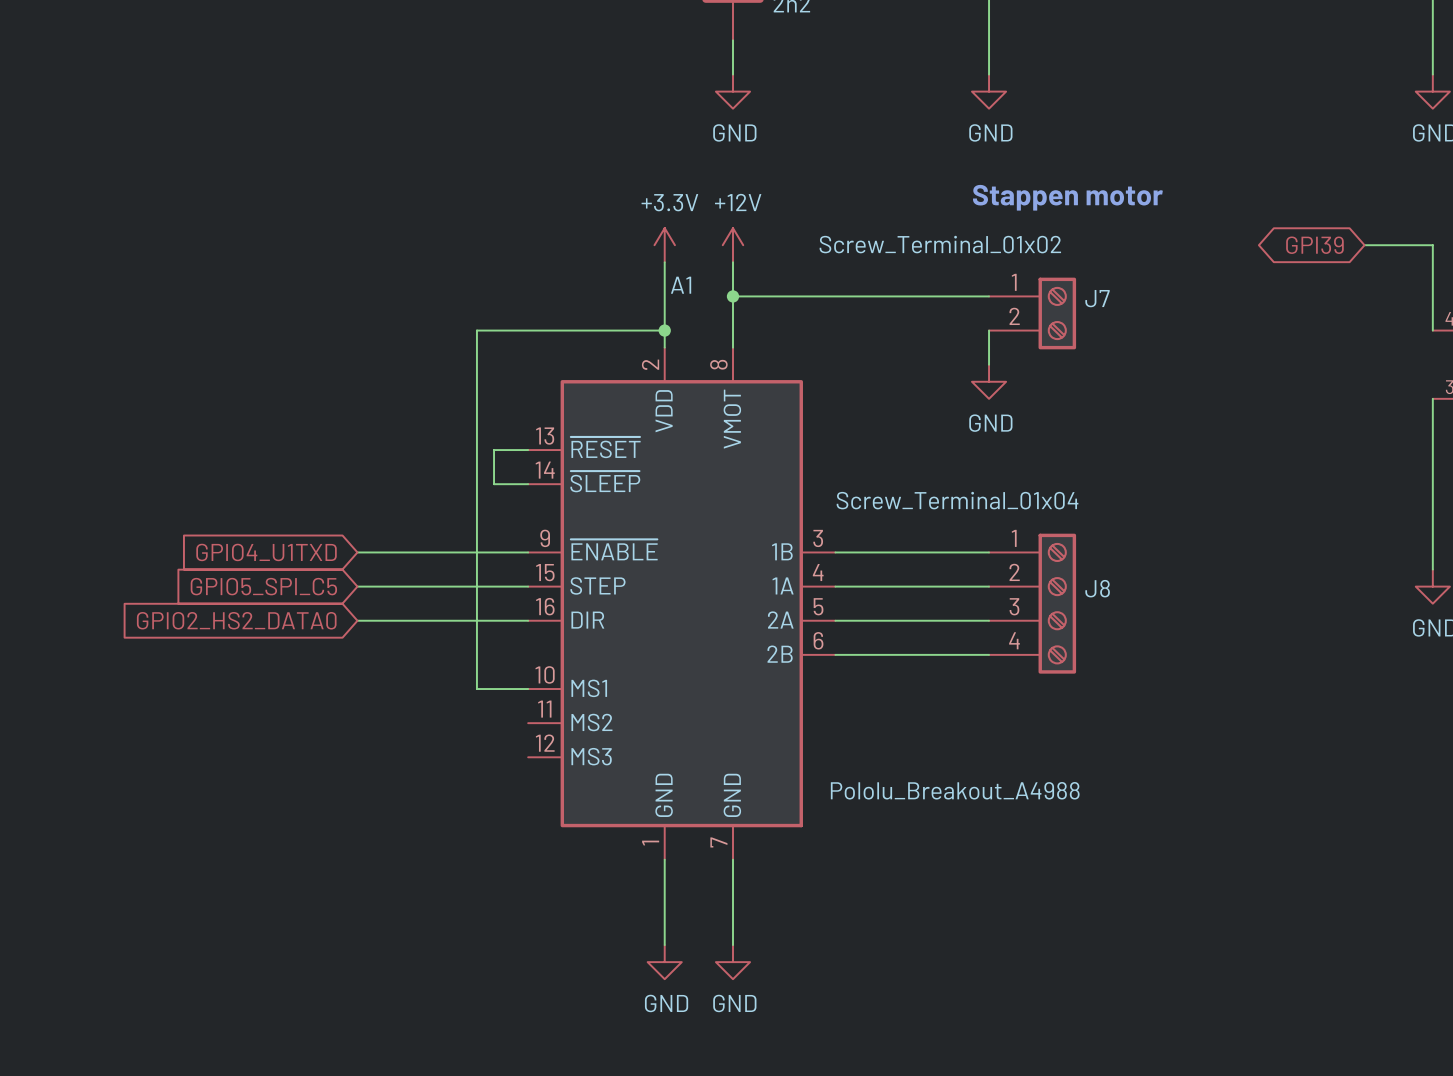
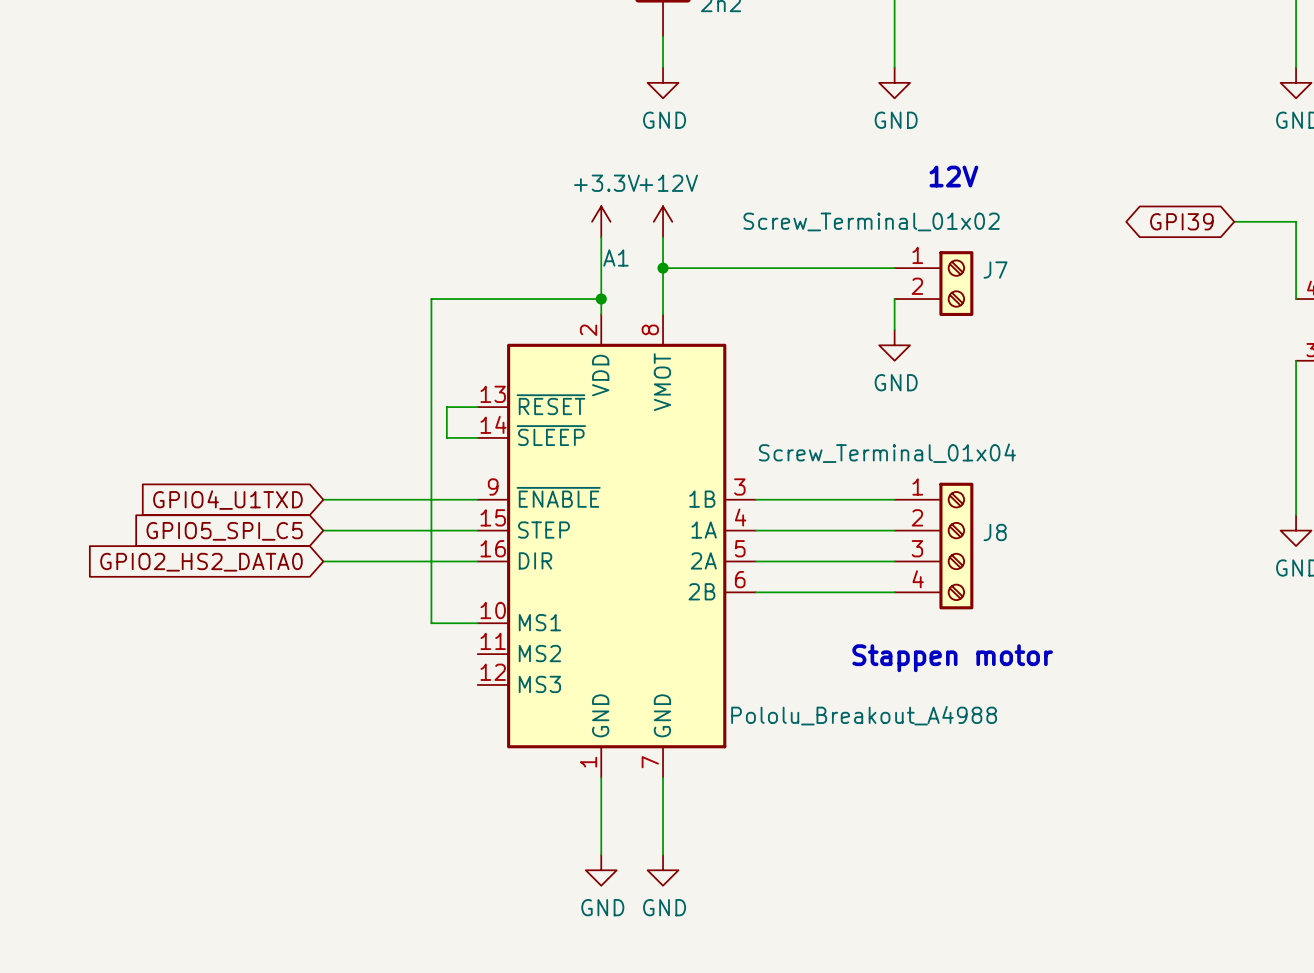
text: none -> 12V (953, 176)
text: Stappen motor (1067, 197) -> none
text: none -> Stappen motor (952, 658)

